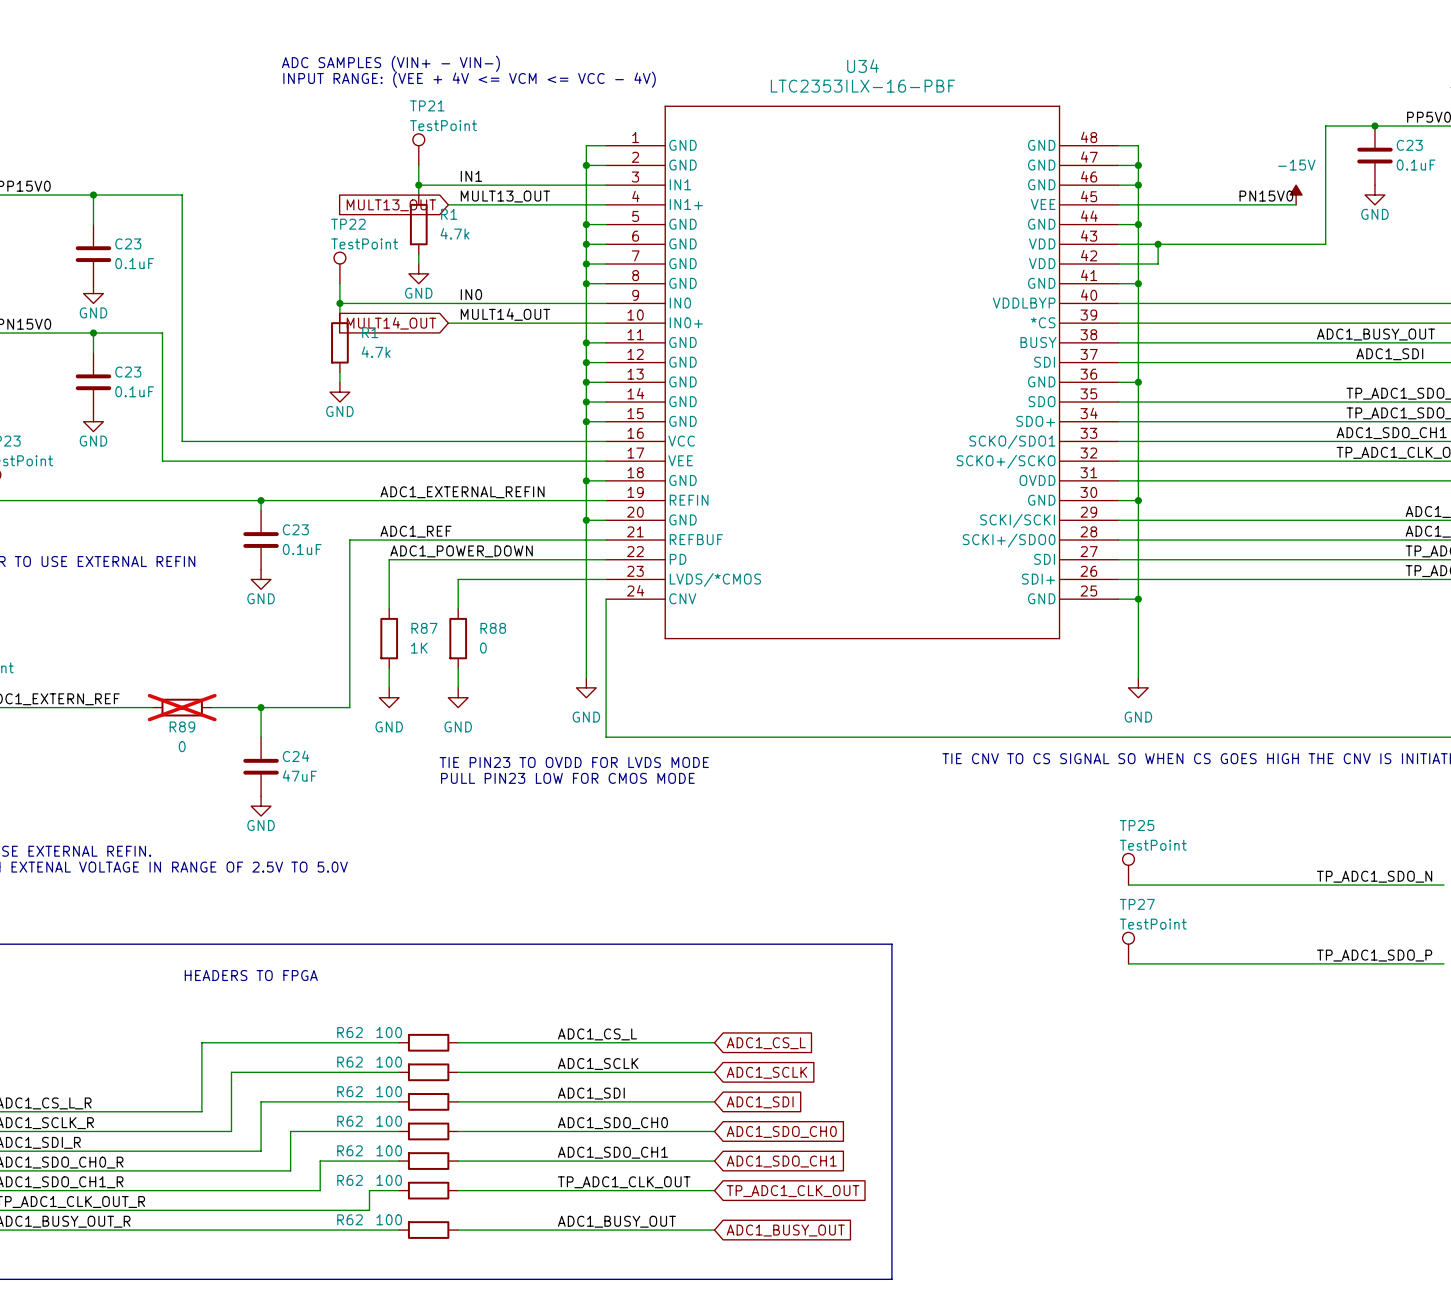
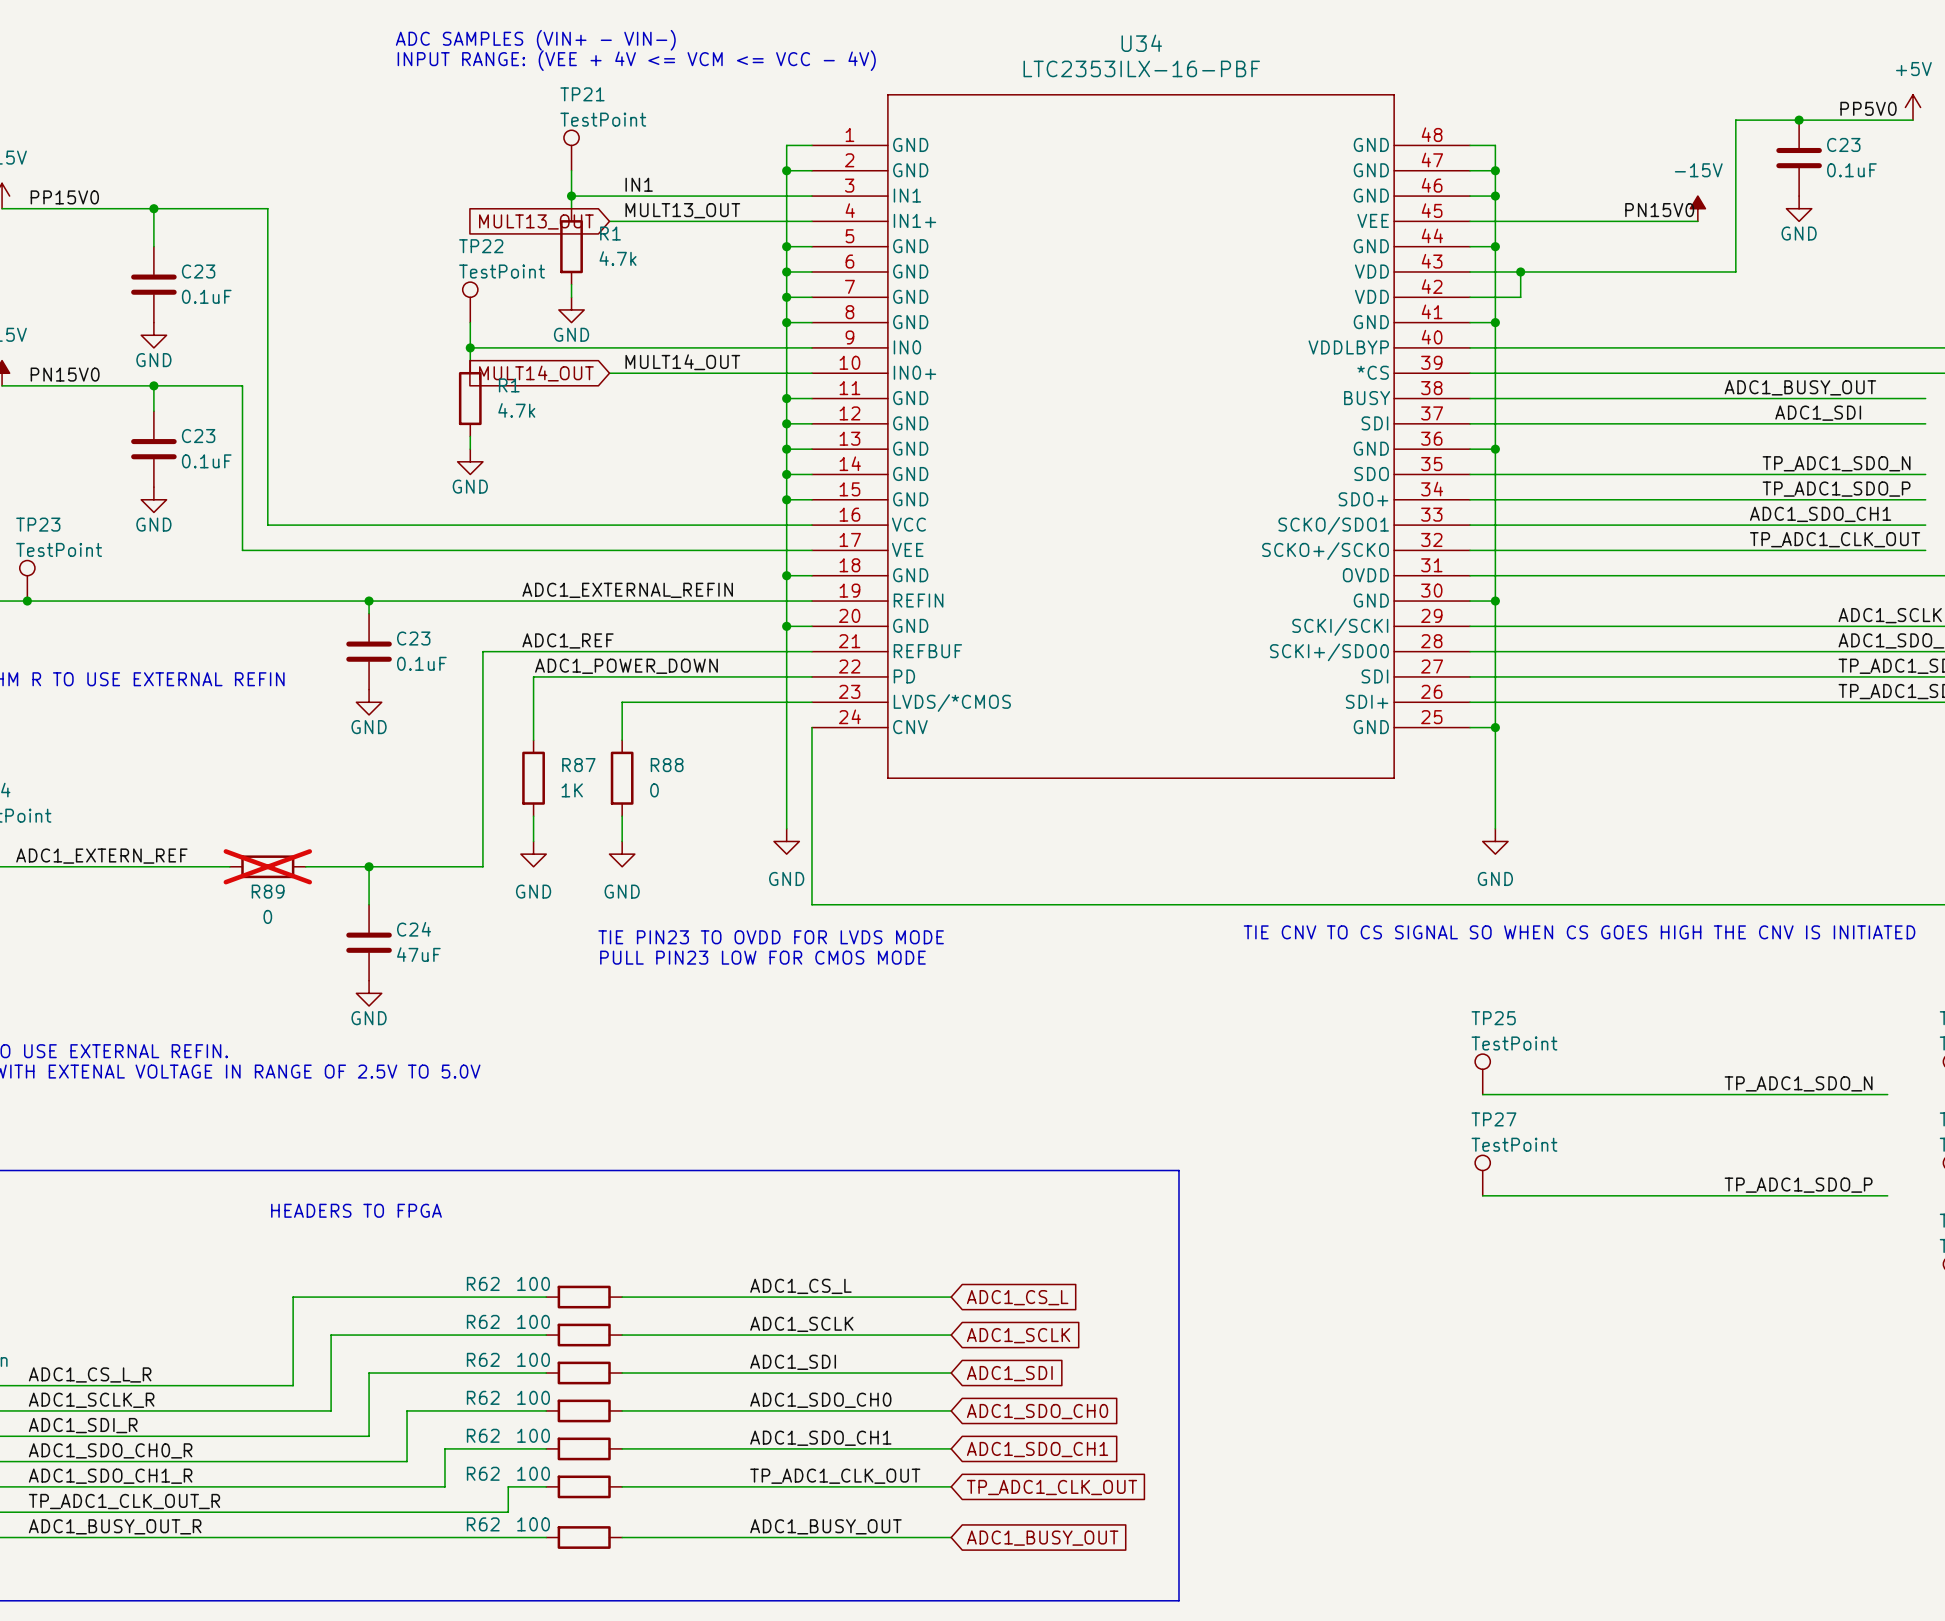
label: IN0 (471, 294) -> none

